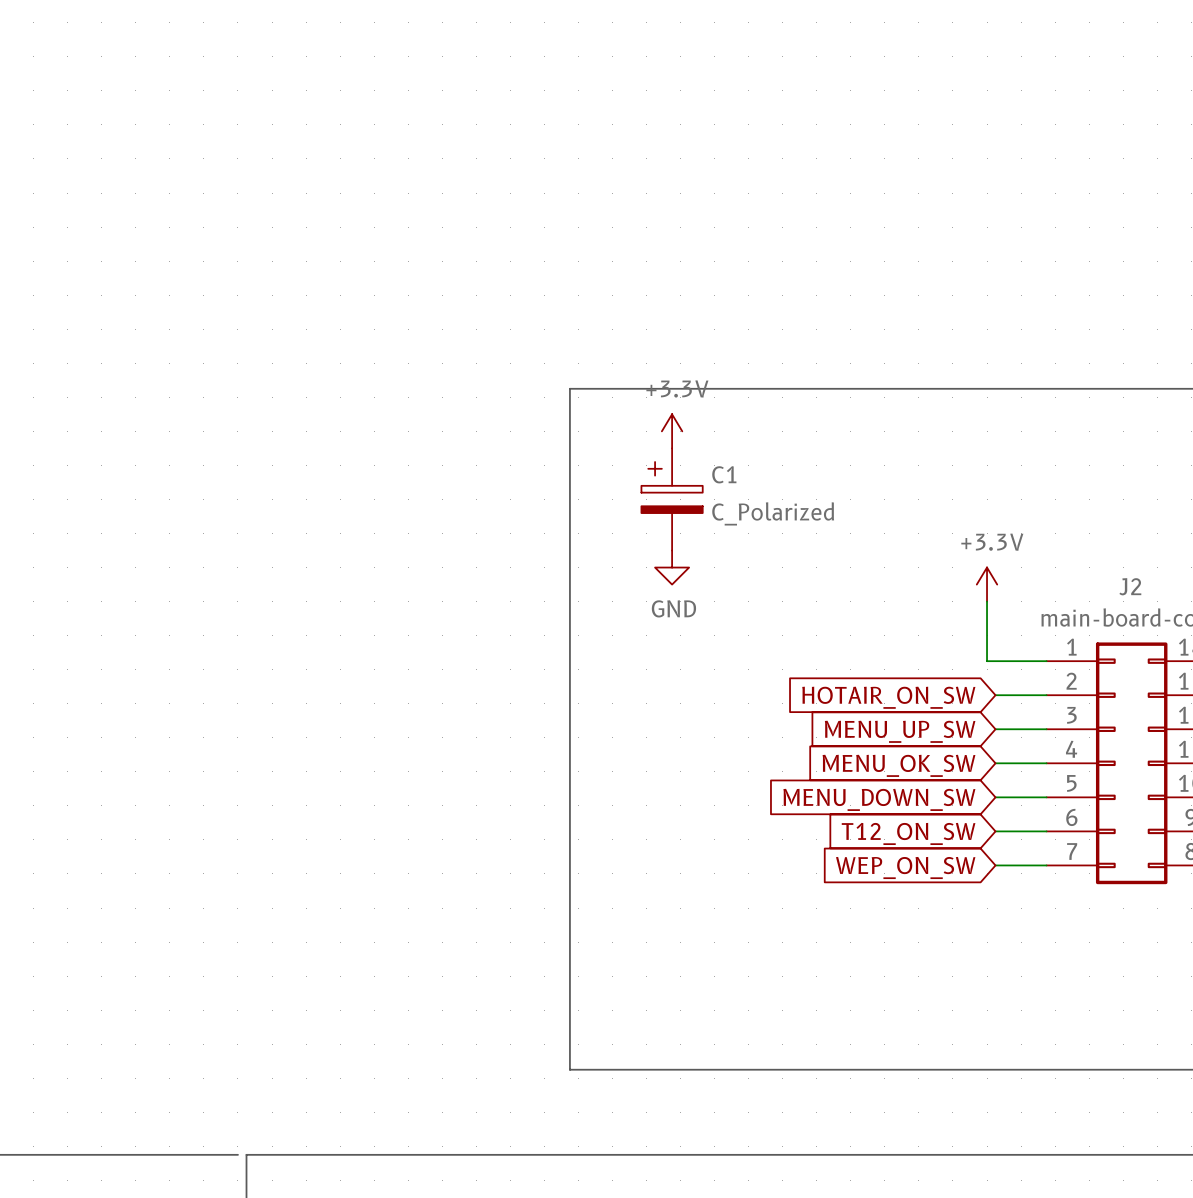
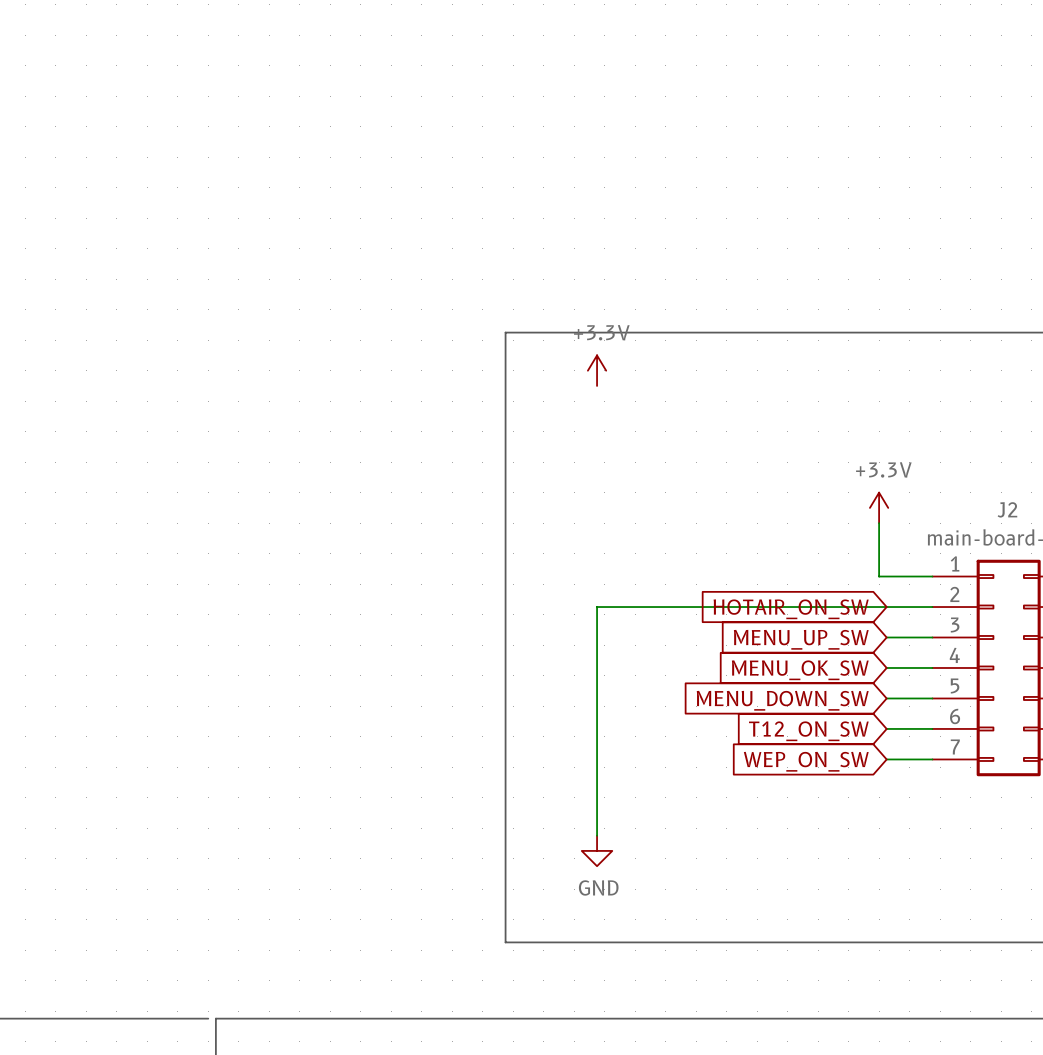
C1: C_Polarized (672, 499) -> none
power symbol: GND (672, 567) -> none
wire: none -> (886, 607) (597, 607) (597, 835)
power symbol: none -> GND (597, 850)

